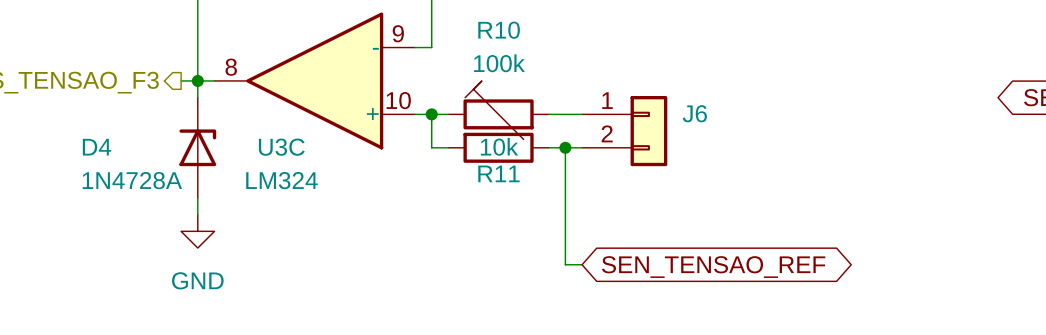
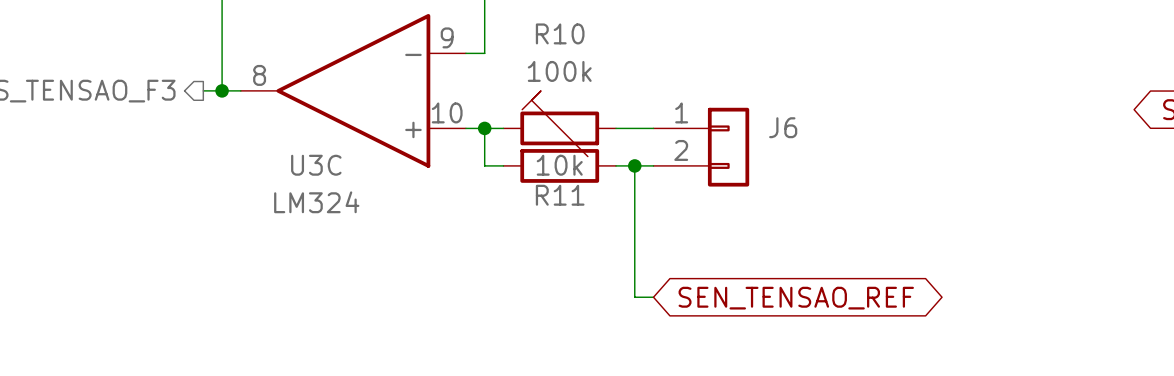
wire: (197, 80) (197, 97) -> none
D4: 1N4728A (197, 147) -> none
wire: (197, 197) (197, 214) -> none
power symbol: GND (197, 231) -> none

